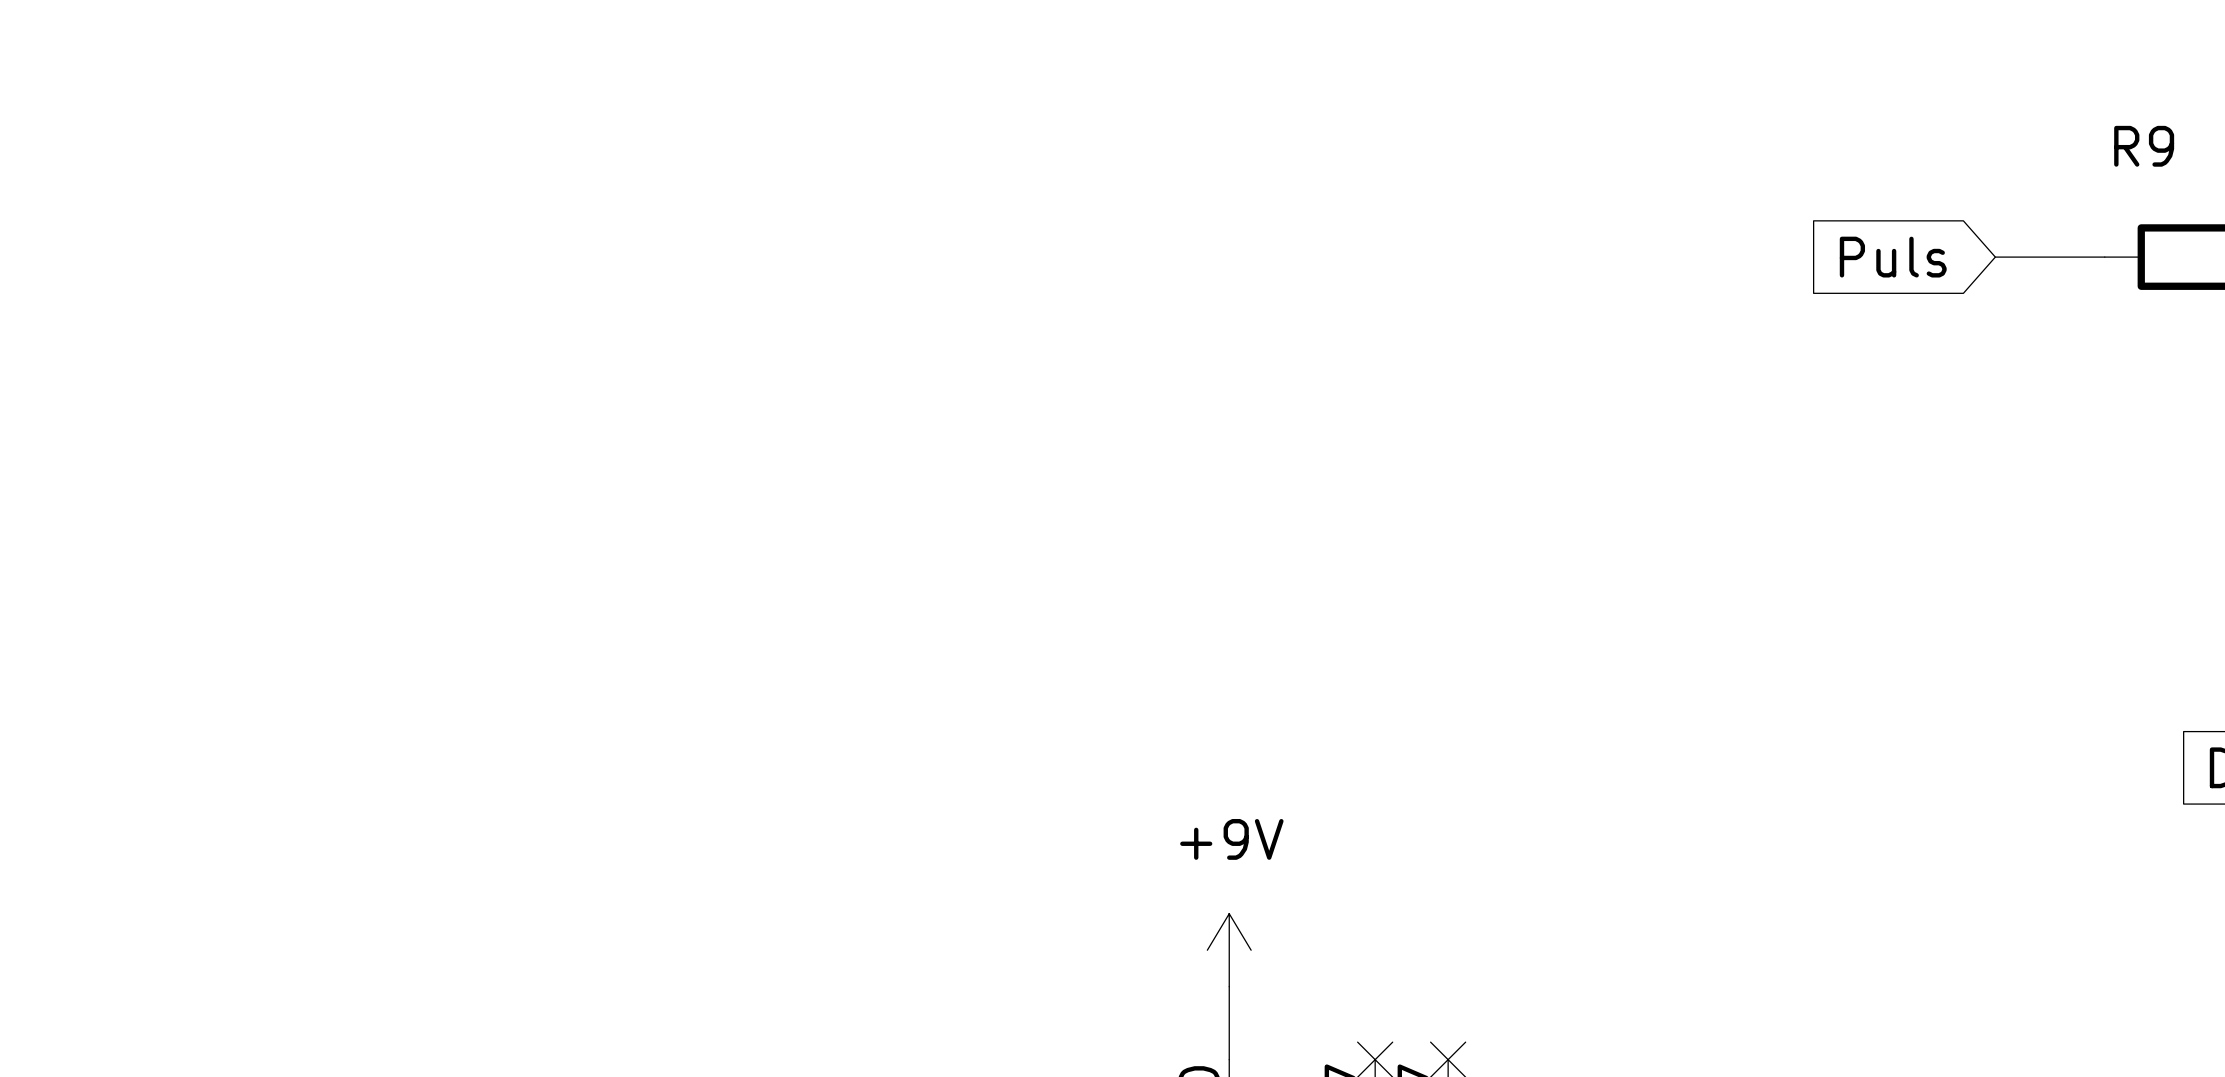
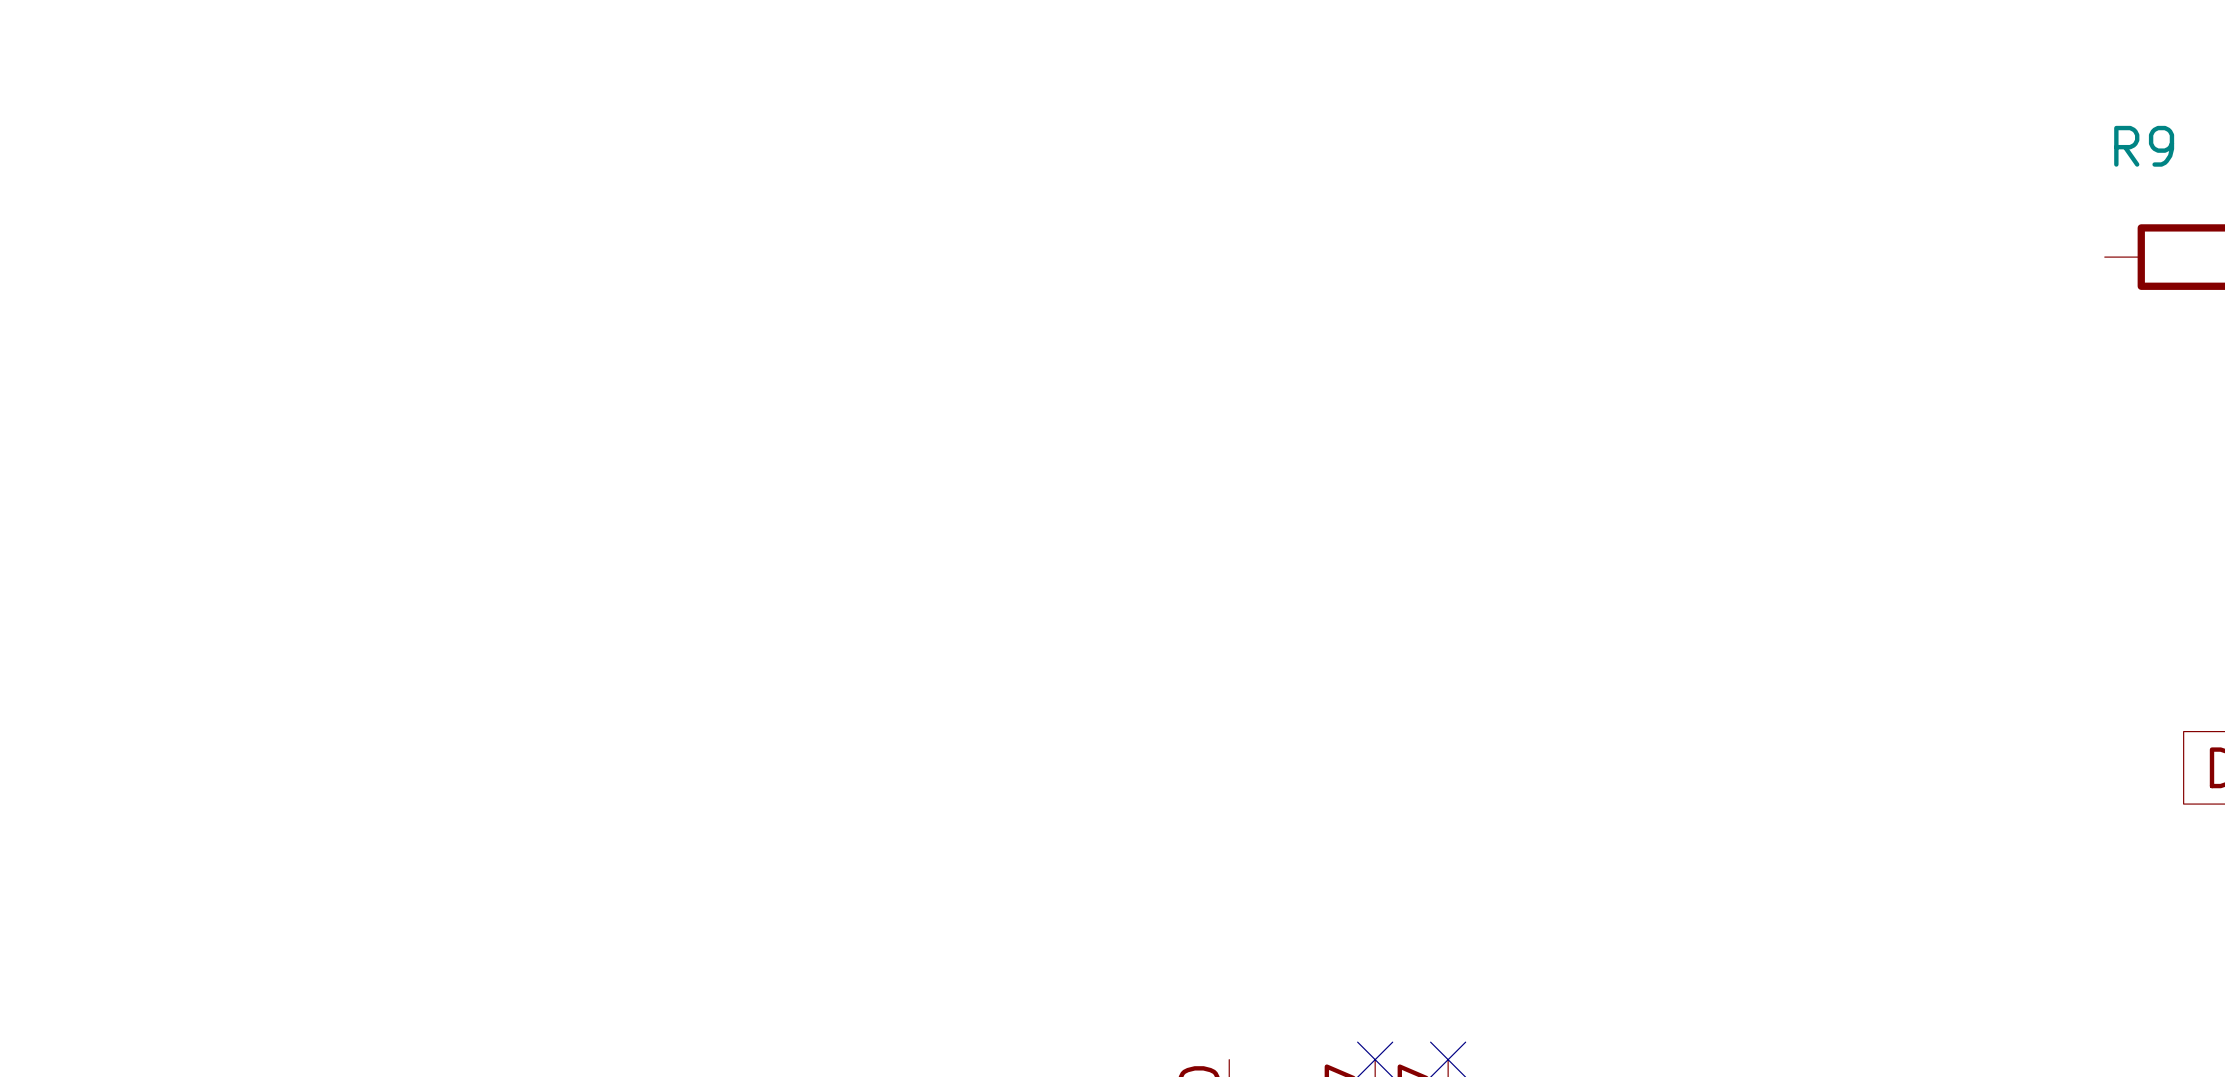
global label: Puls (1893, 257) -> none
wire: (1995, 257) (2104, 257) -> none
power symbol: +9V (1229, 950) -> none
wire: (1229, 986) (1229, 1059) -> none

